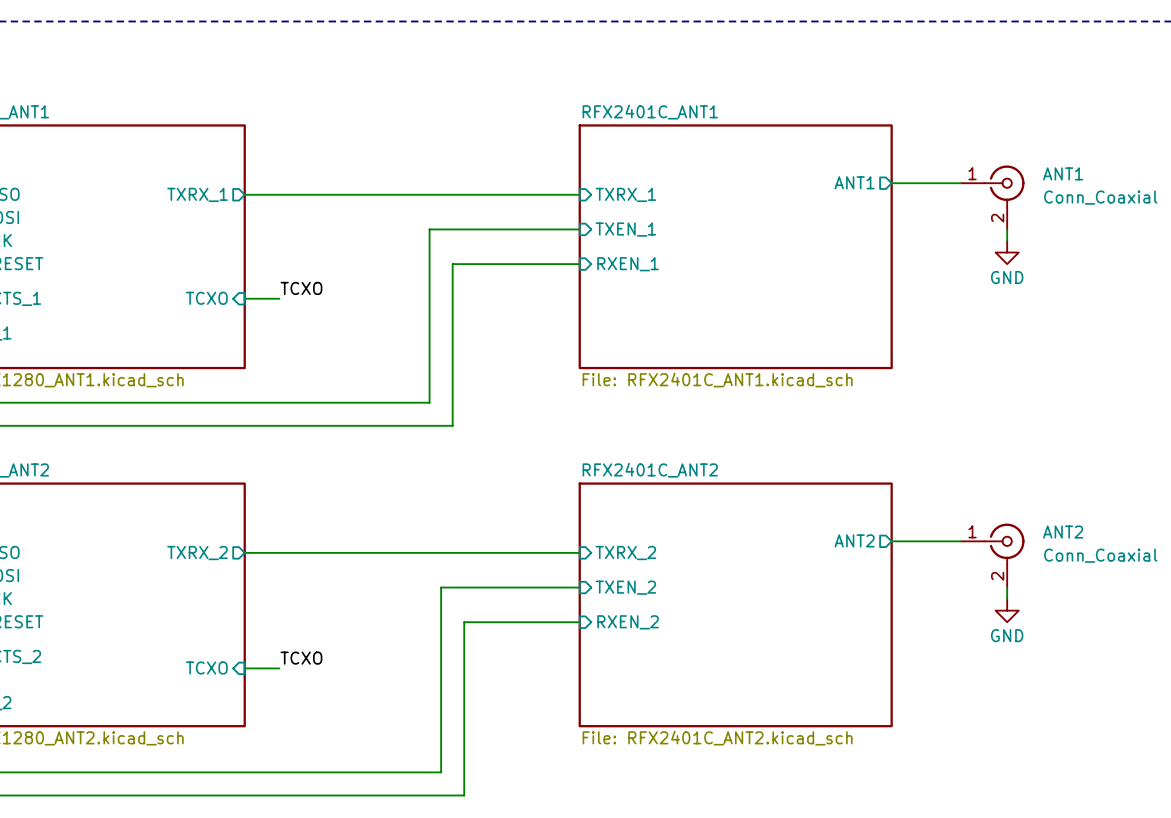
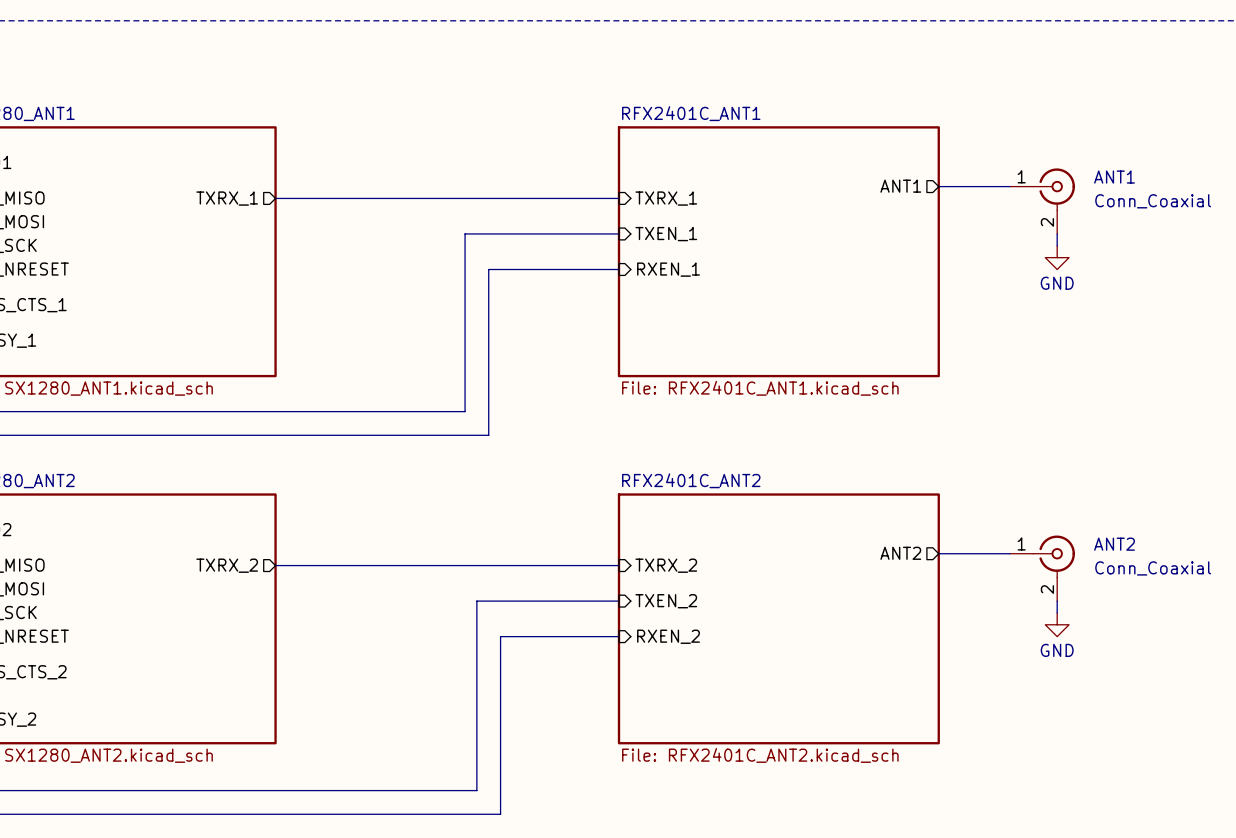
label: TCXO (301, 288) -> none
sheet pin: TCXO (206, 298) -> none
wire: (244, 298) (279, 298) -> none
label: TCXO (301, 658) -> none
sheet pin: TCXO (206, 667) -> none
wire: (244, 668) (279, 668) -> none

